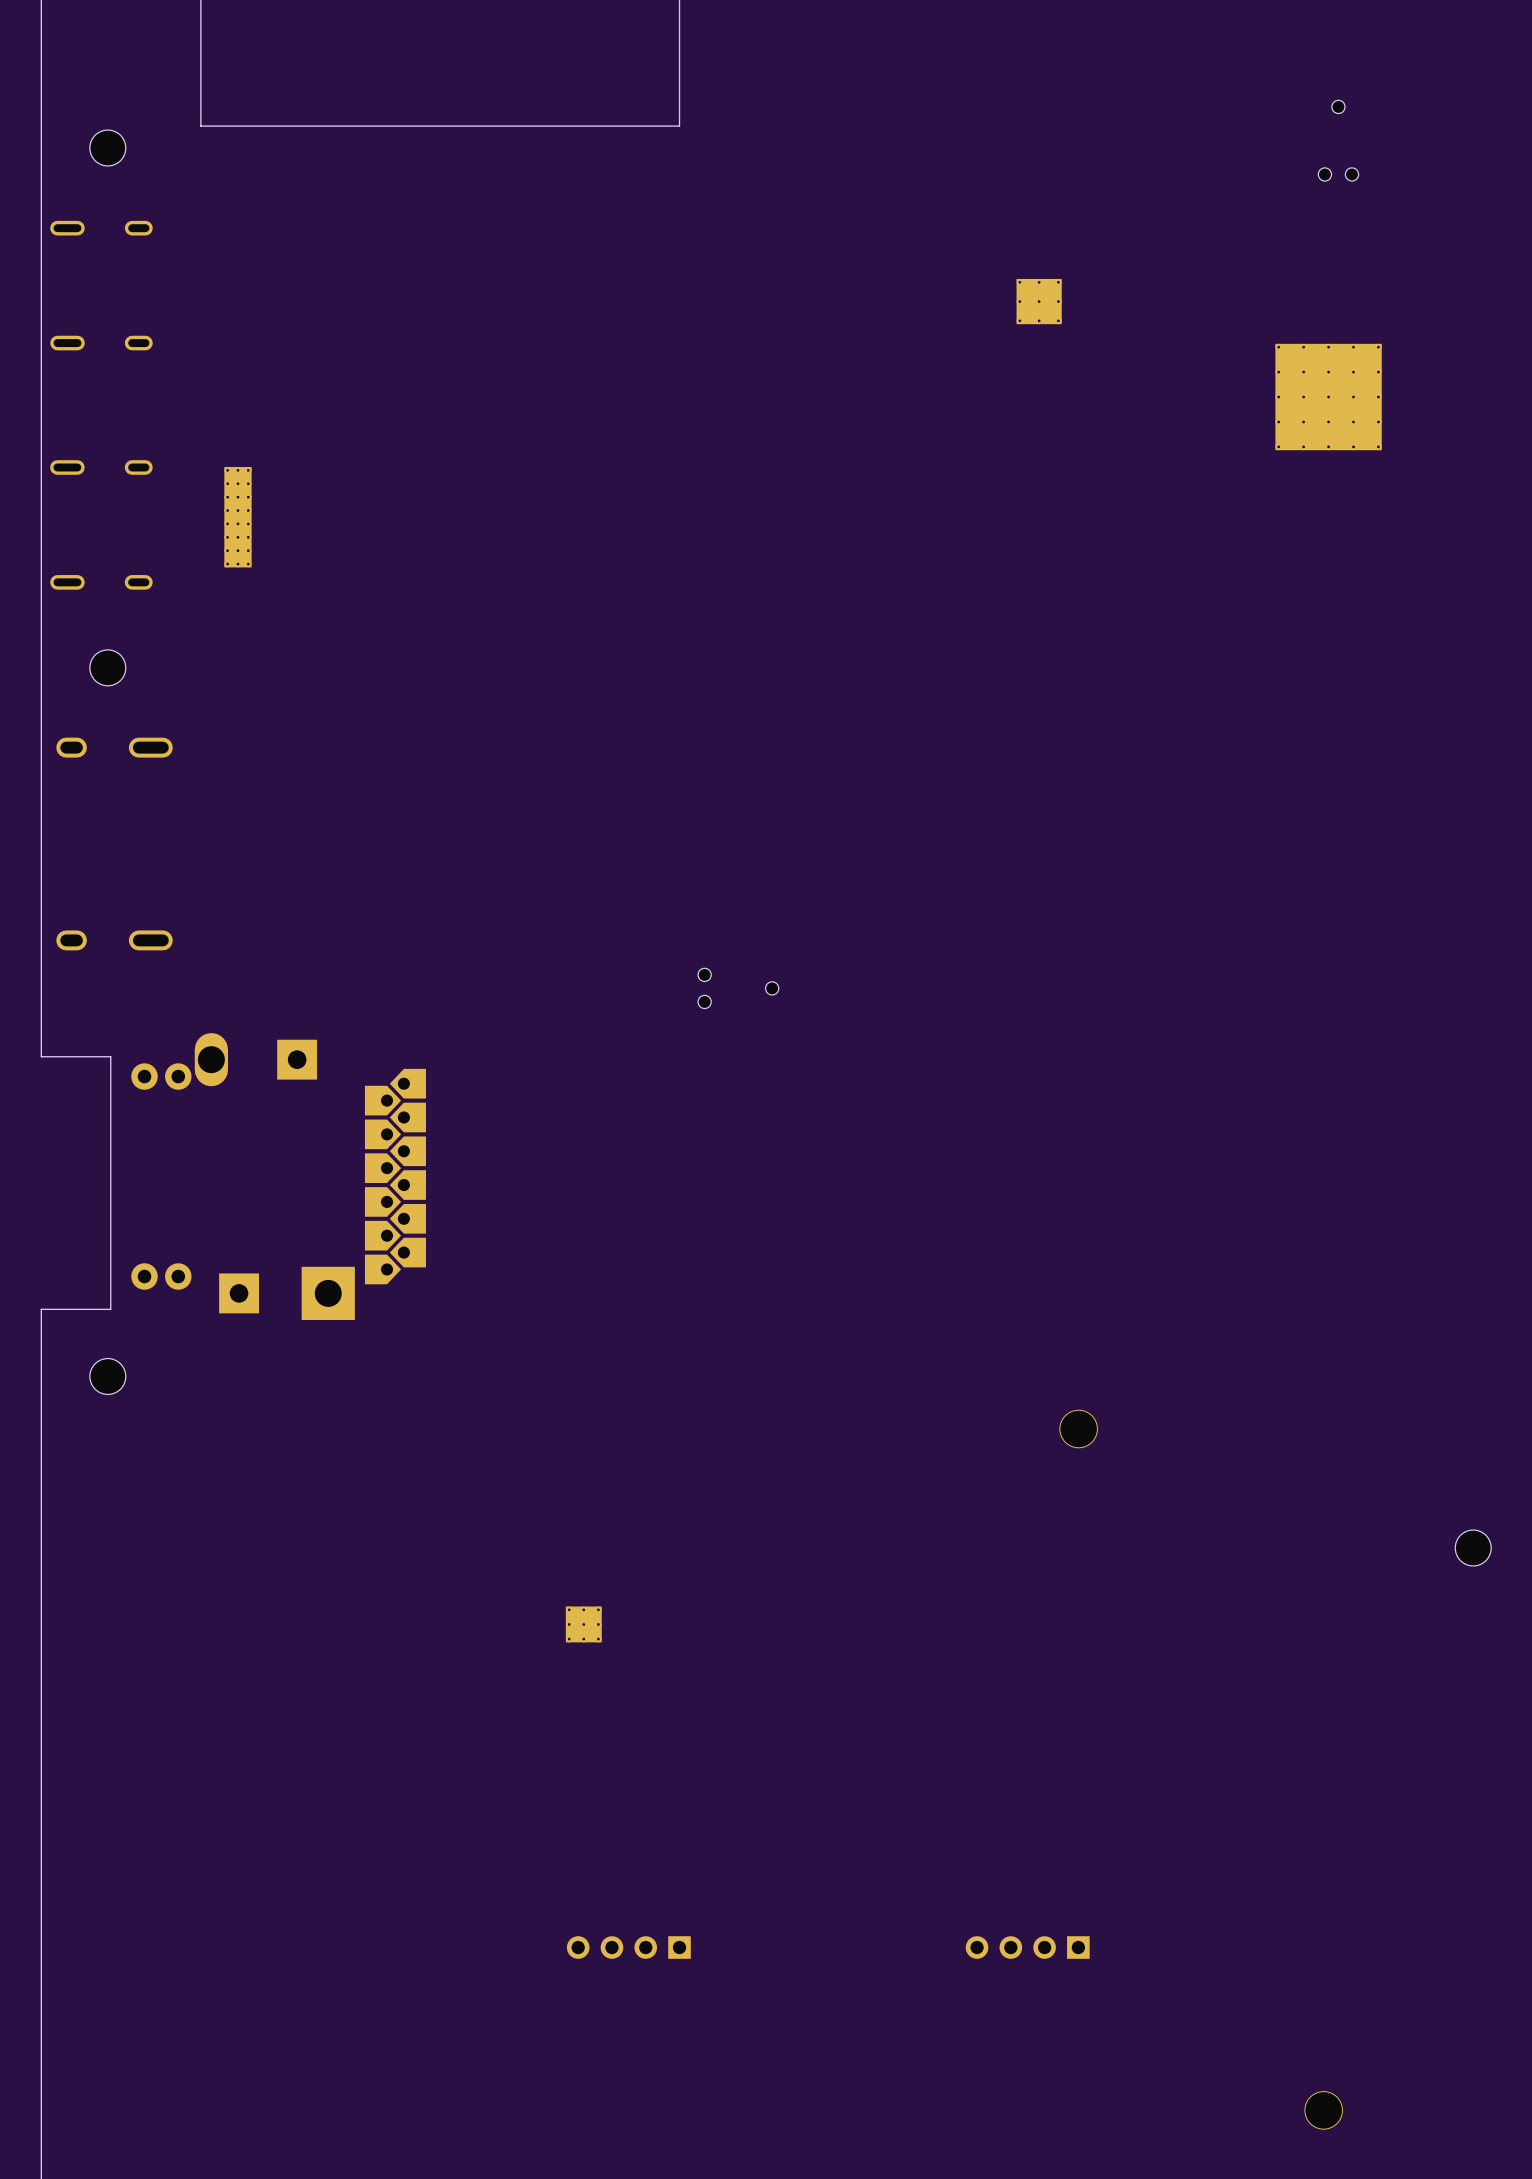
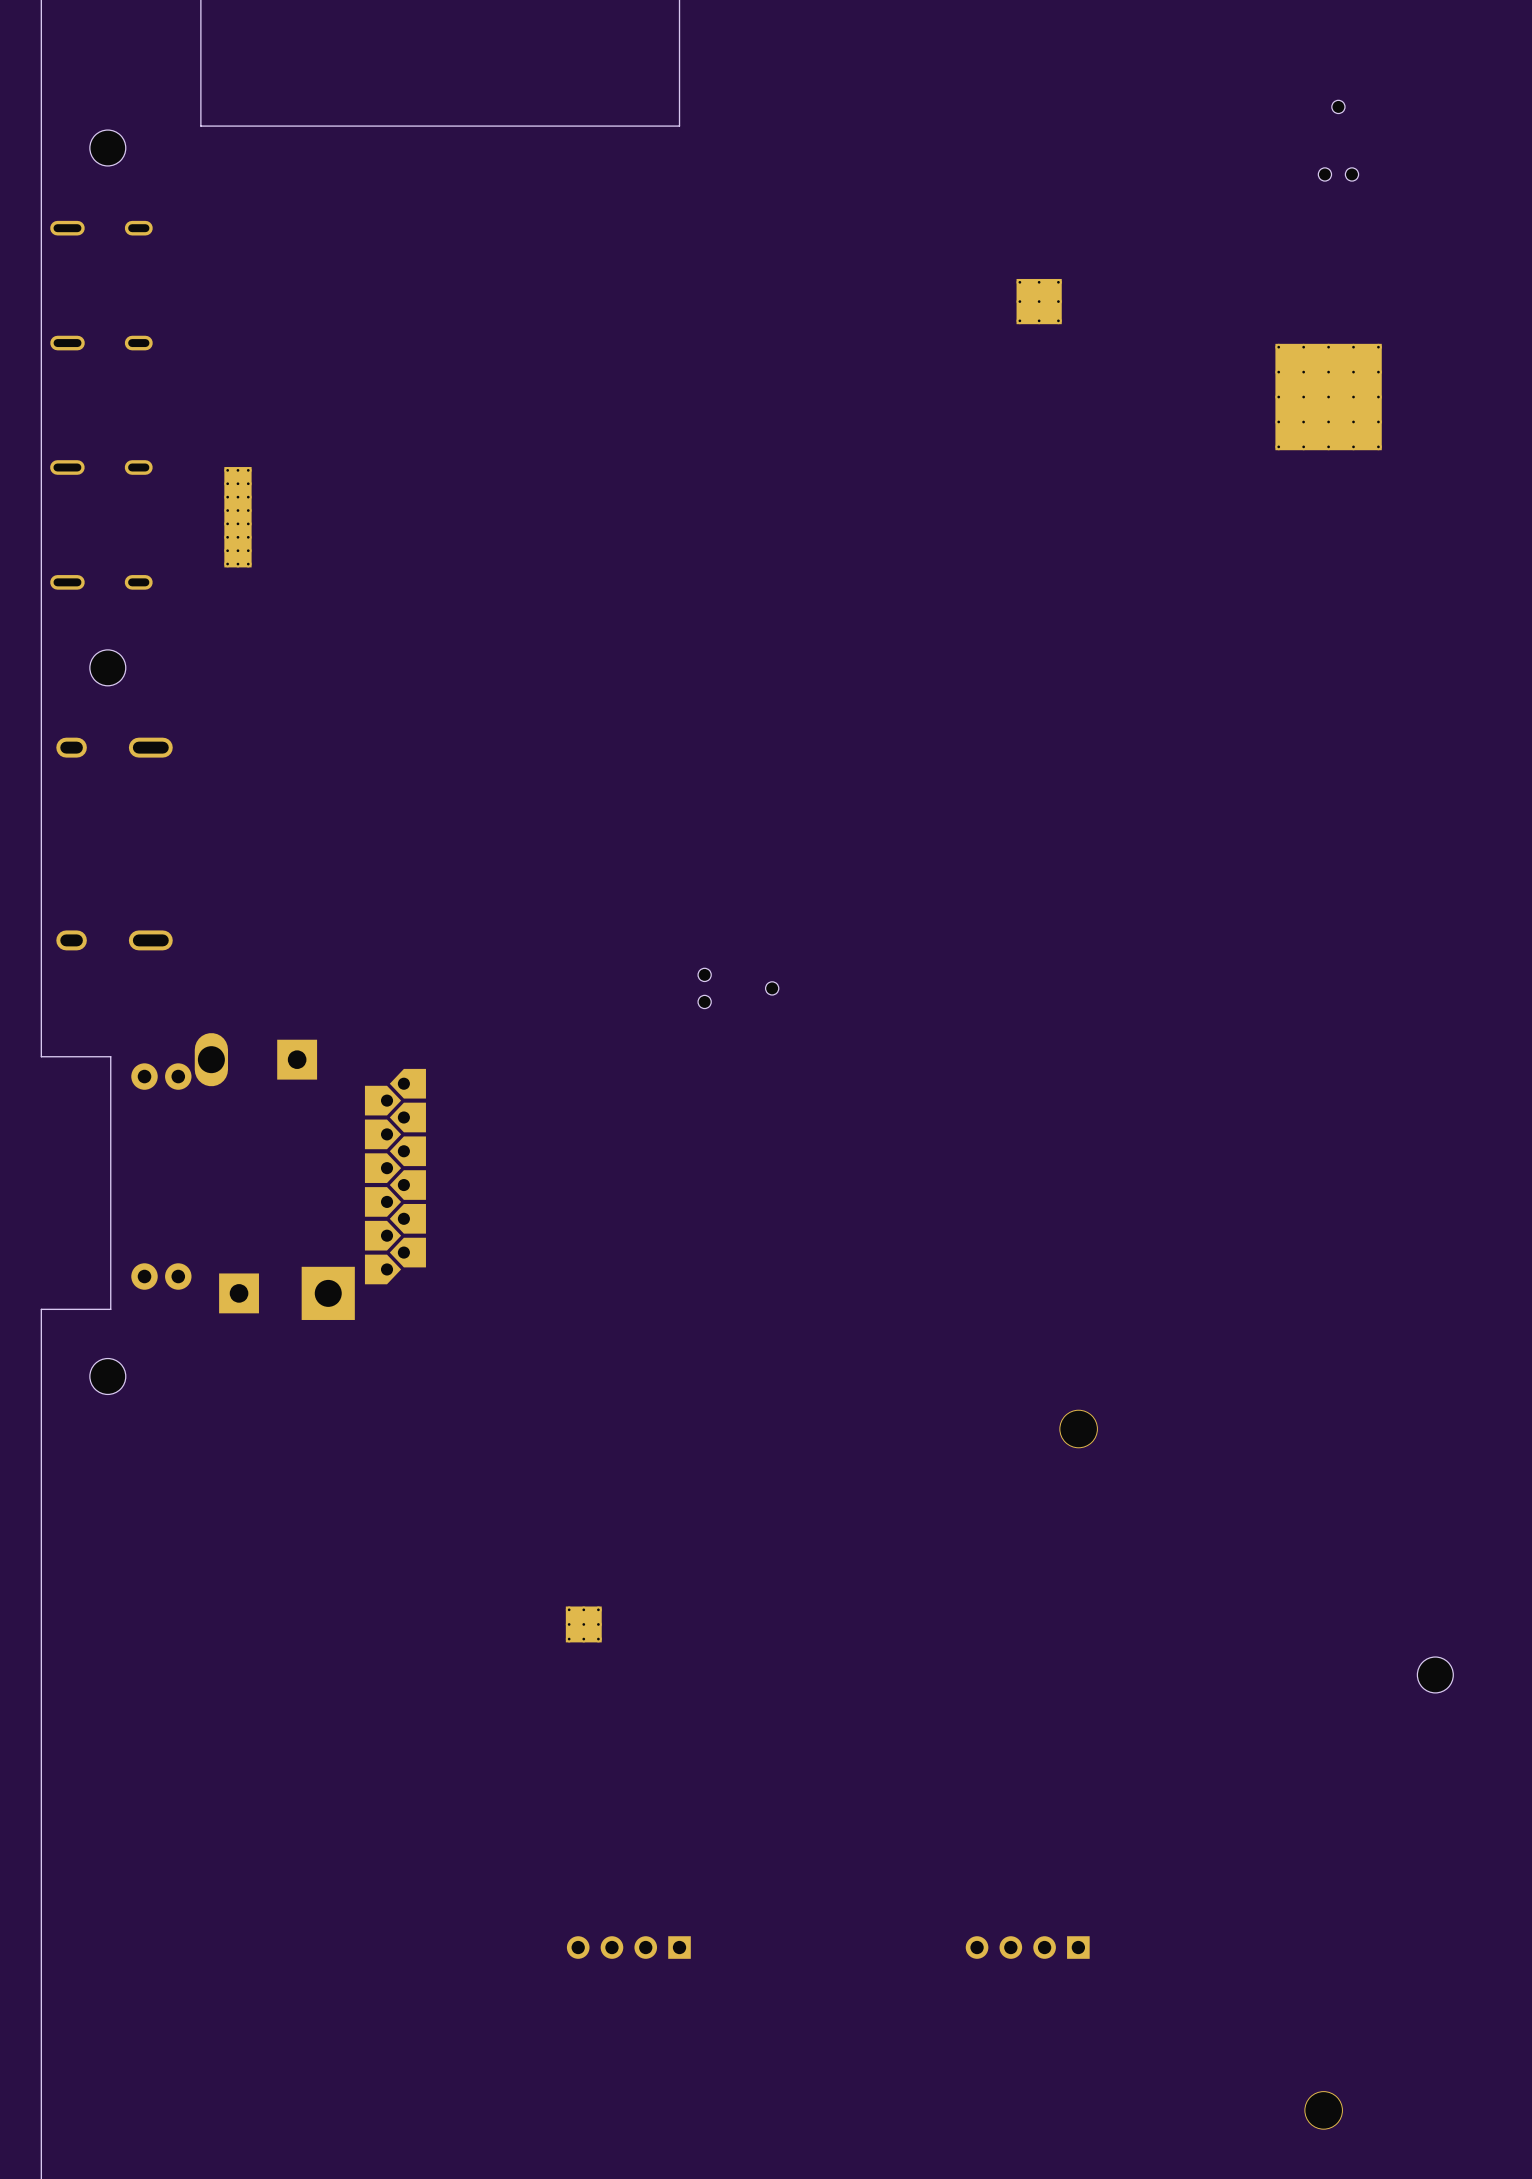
part position: (1473, 1548) -> (1435, 1674)

